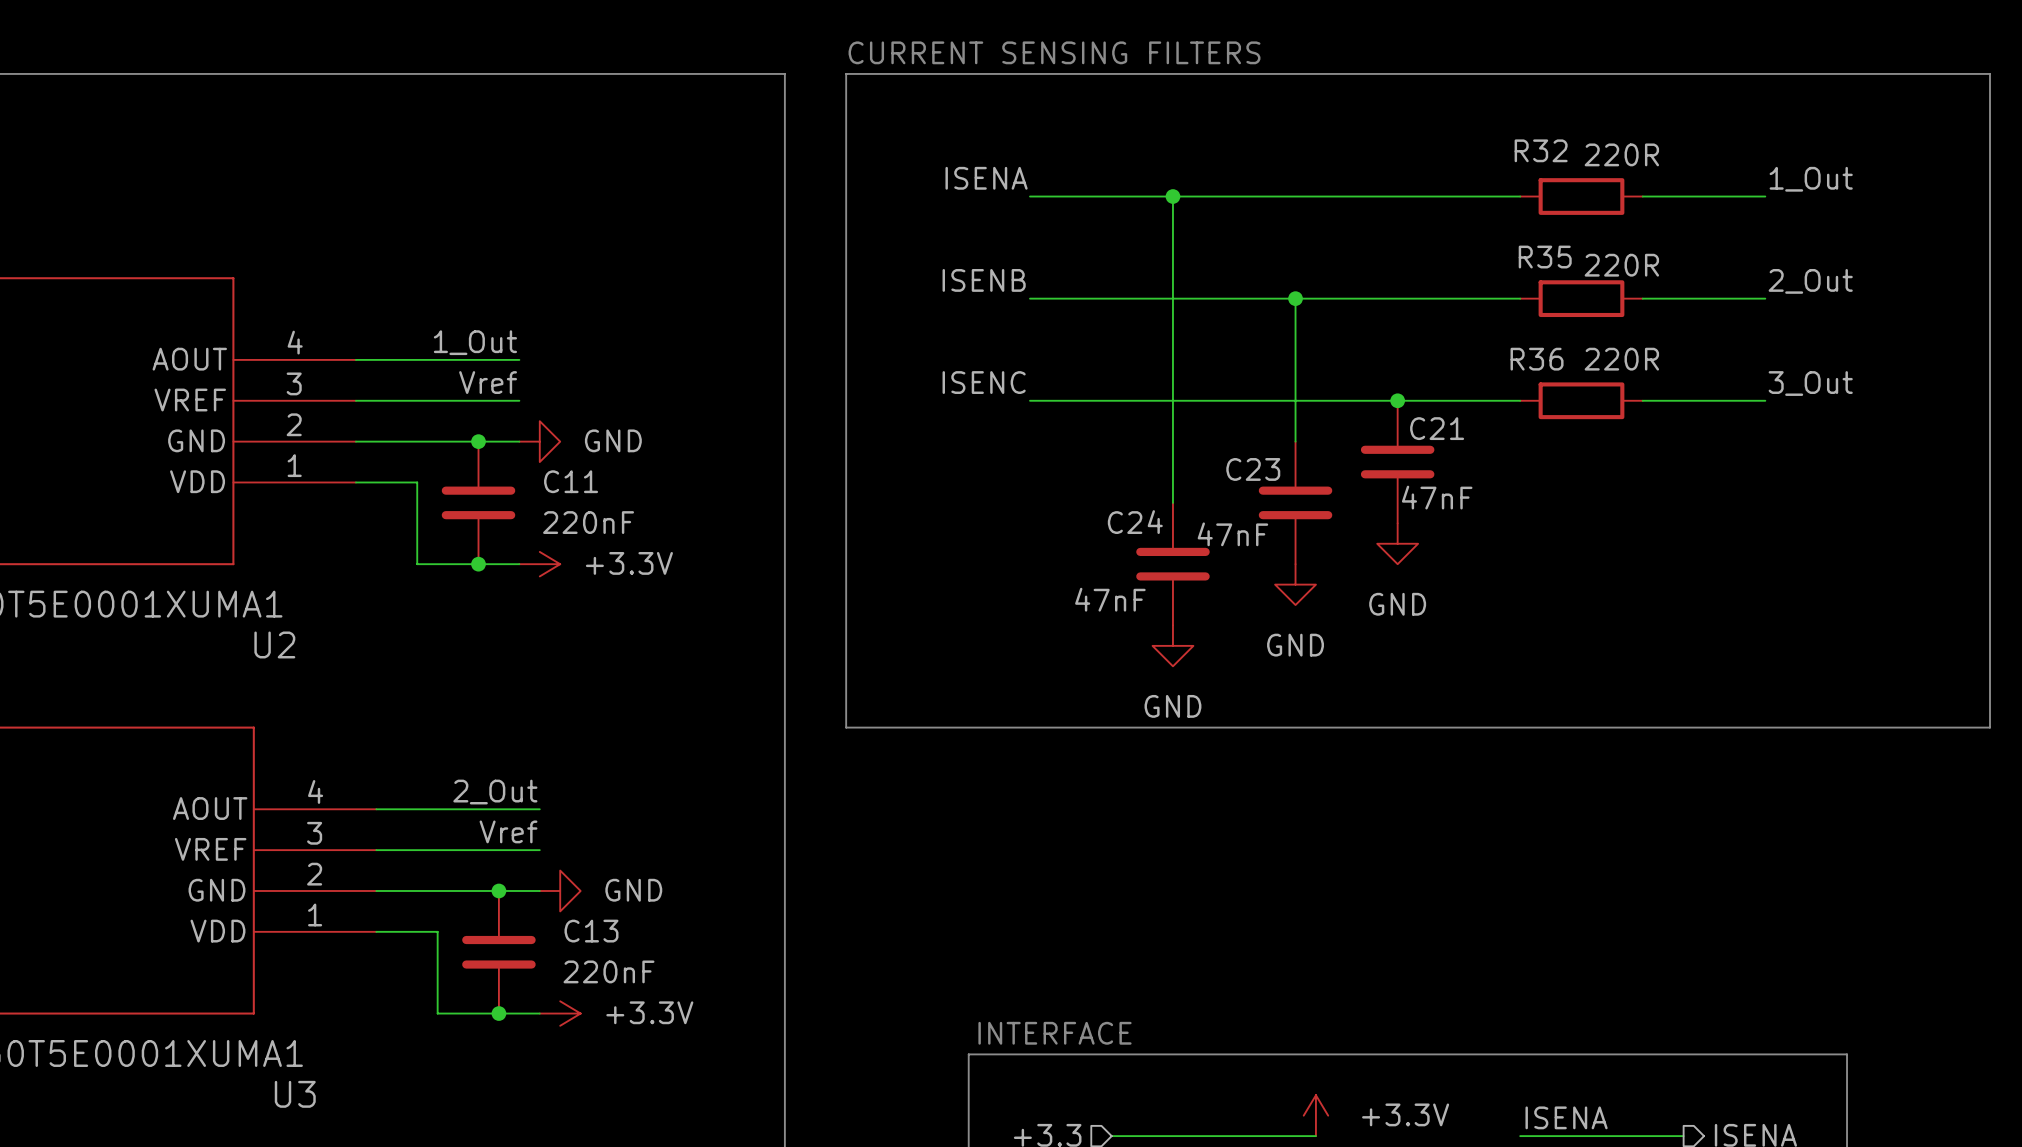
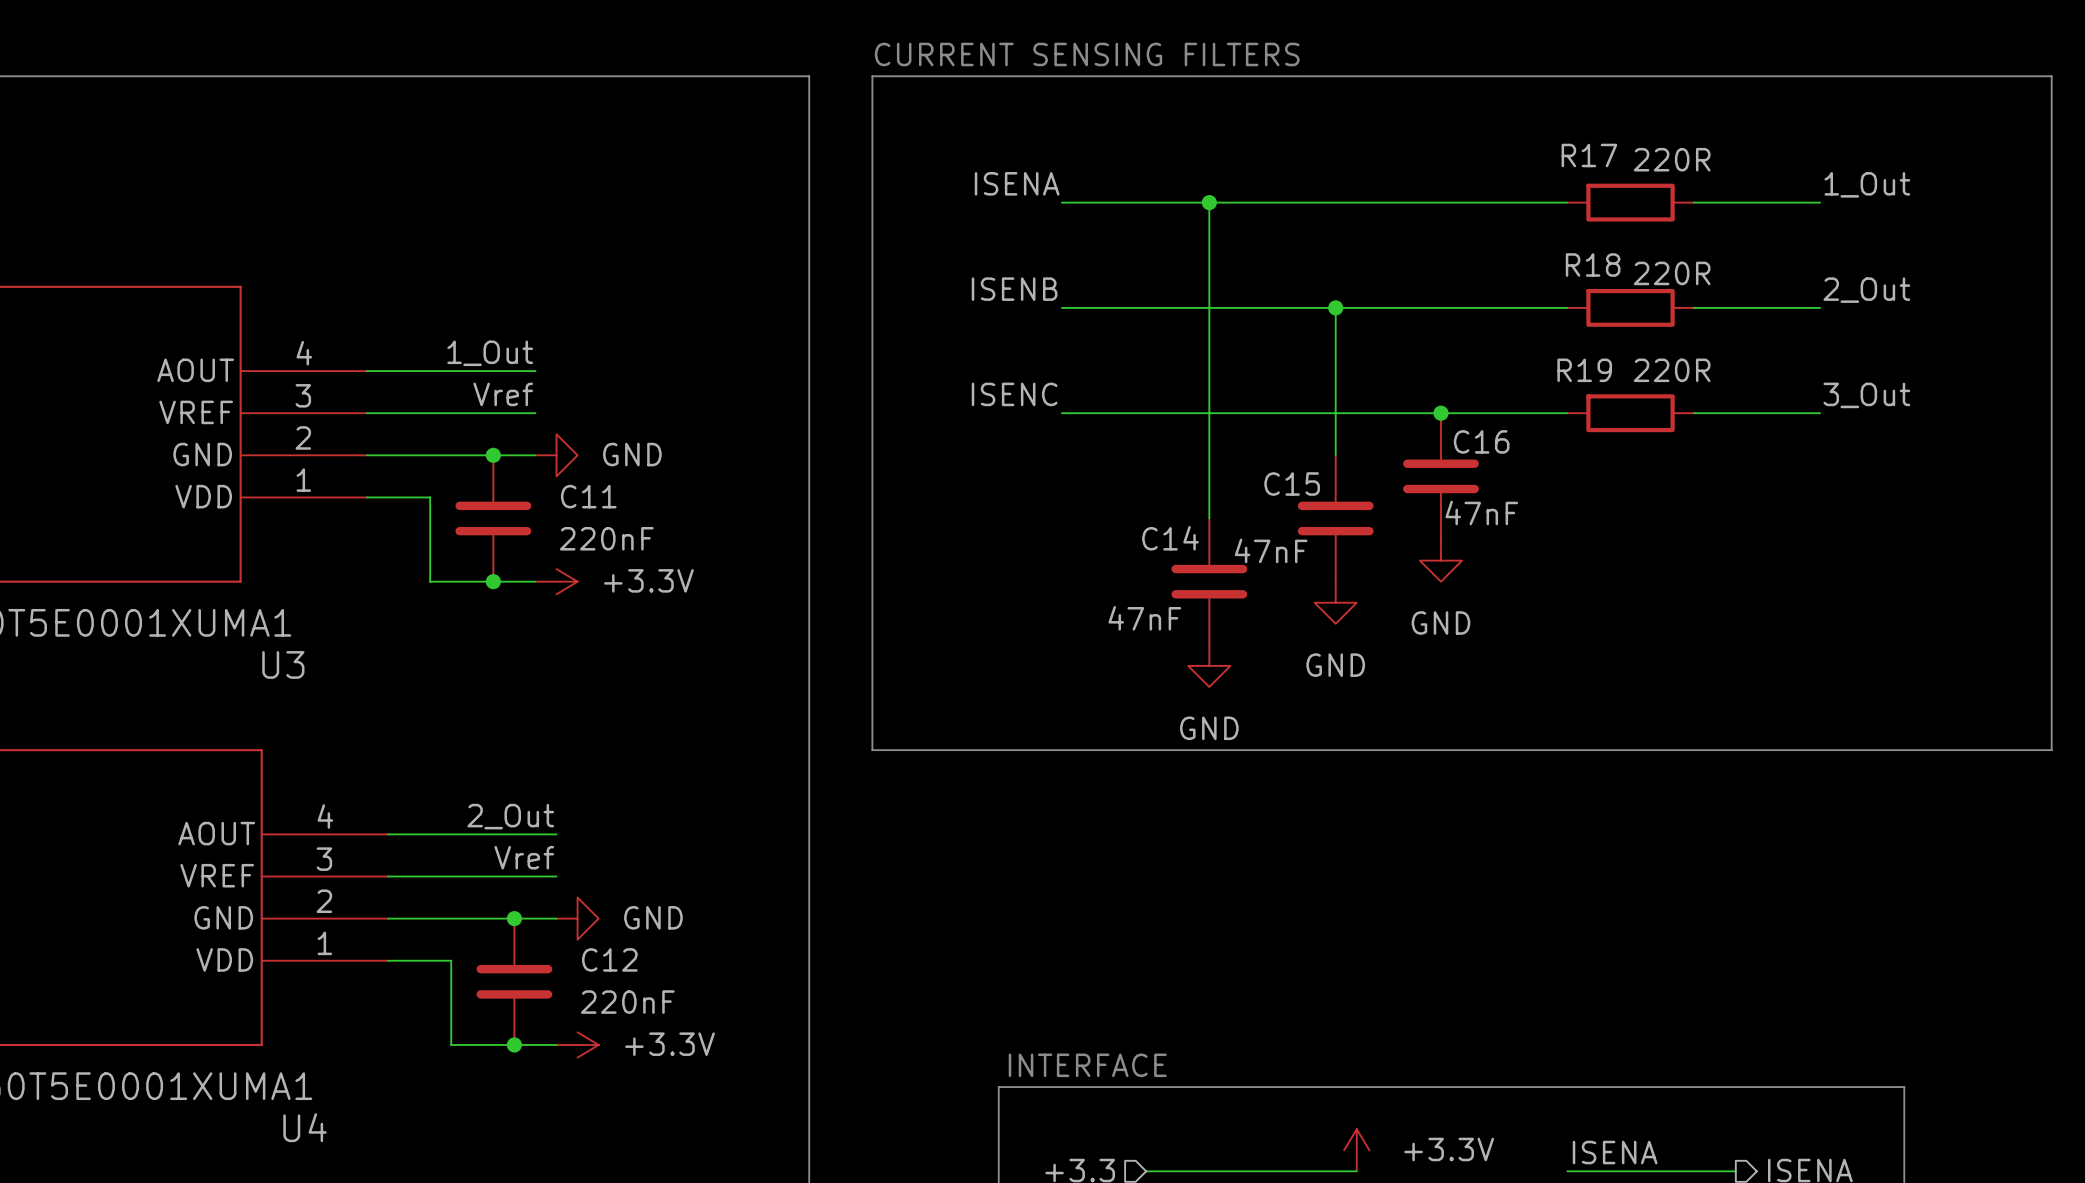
R32 name: R32 (1541, 150) -> R17 (1589, 155)
R35 name: R35 (1545, 257) -> R18 (1593, 265)
R36 name: R36 (1537, 359) -> R19 (1584, 370)
C21 name: C21 (1437, 428) -> C16 (1481, 441)
C23 name: C23 (1253, 469) -> C15 (1292, 484)
C24 name: C24 (1135, 522) -> C14 (1170, 538)
U2 name: U2 (274, 644) -> U3 (283, 664)
C13 name: C13 (591, 931) -> C12 (609, 959)
U3 name: U3 (295, 1094) -> U4 (305, 1127)

